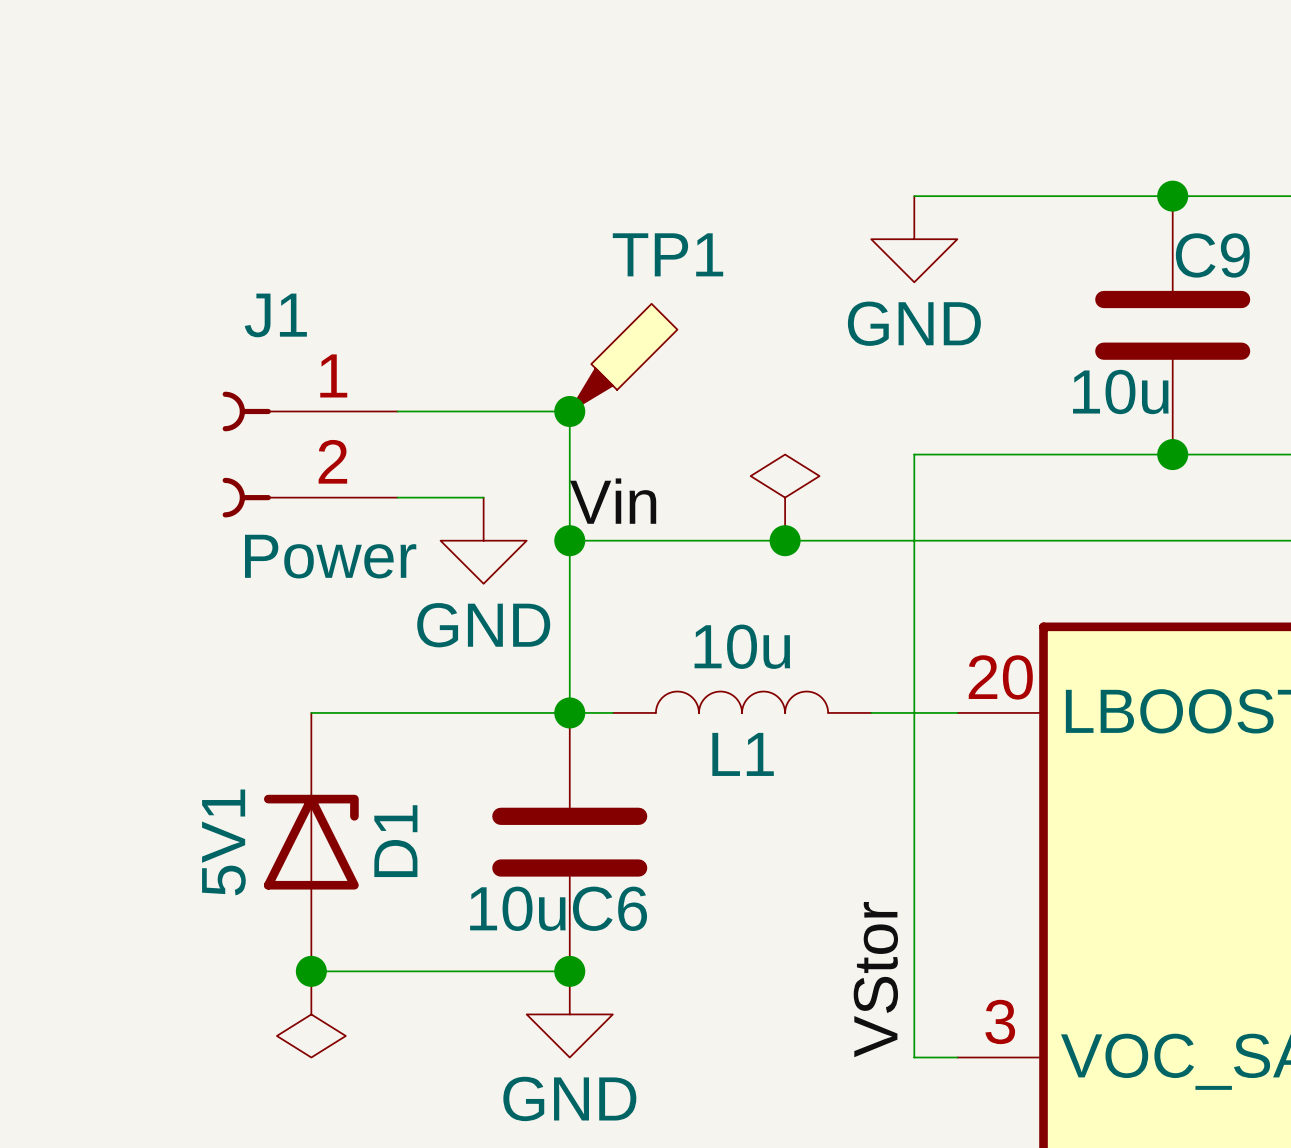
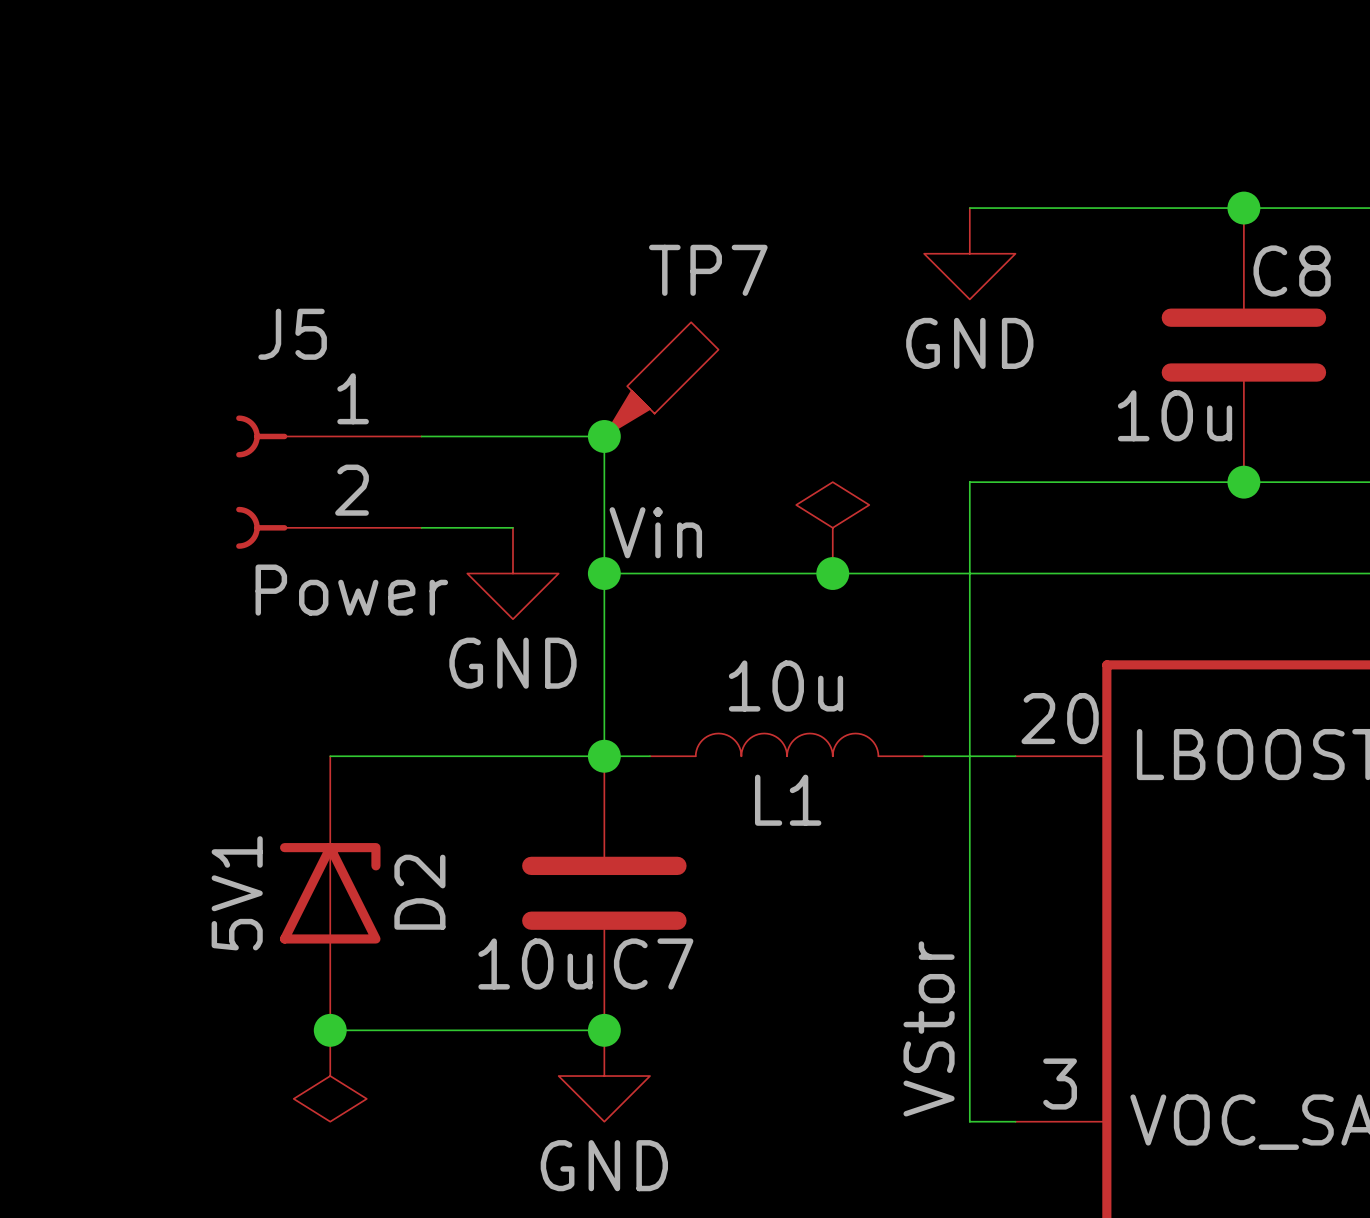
TP1 name: TP1 (667, 254) -> TP7 (708, 270)
C9 name: C9 (1212, 255) -> C8 (1292, 270)
J1 name: J1 (275, 315) -> J5 (292, 334)
D1 name: D1 (395, 841) -> D2 (419, 892)
C6 name: C6 (609, 908) -> C7 (653, 963)

